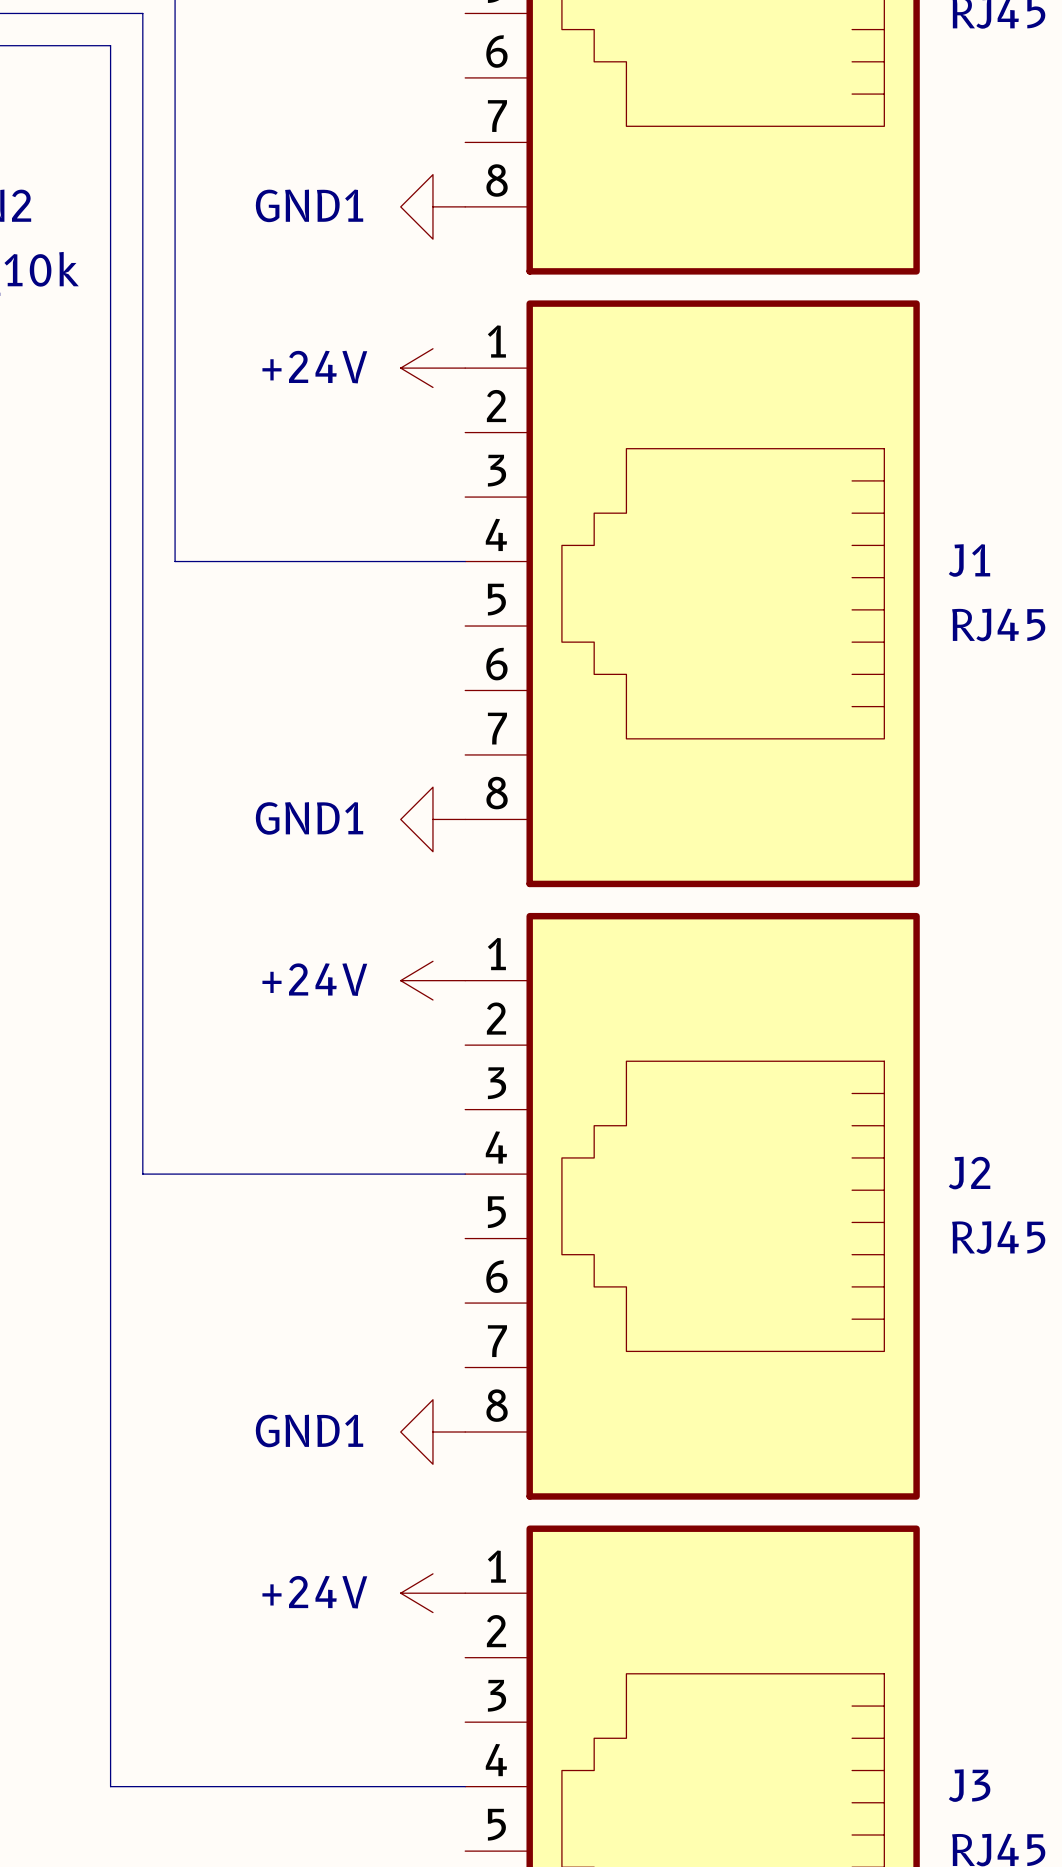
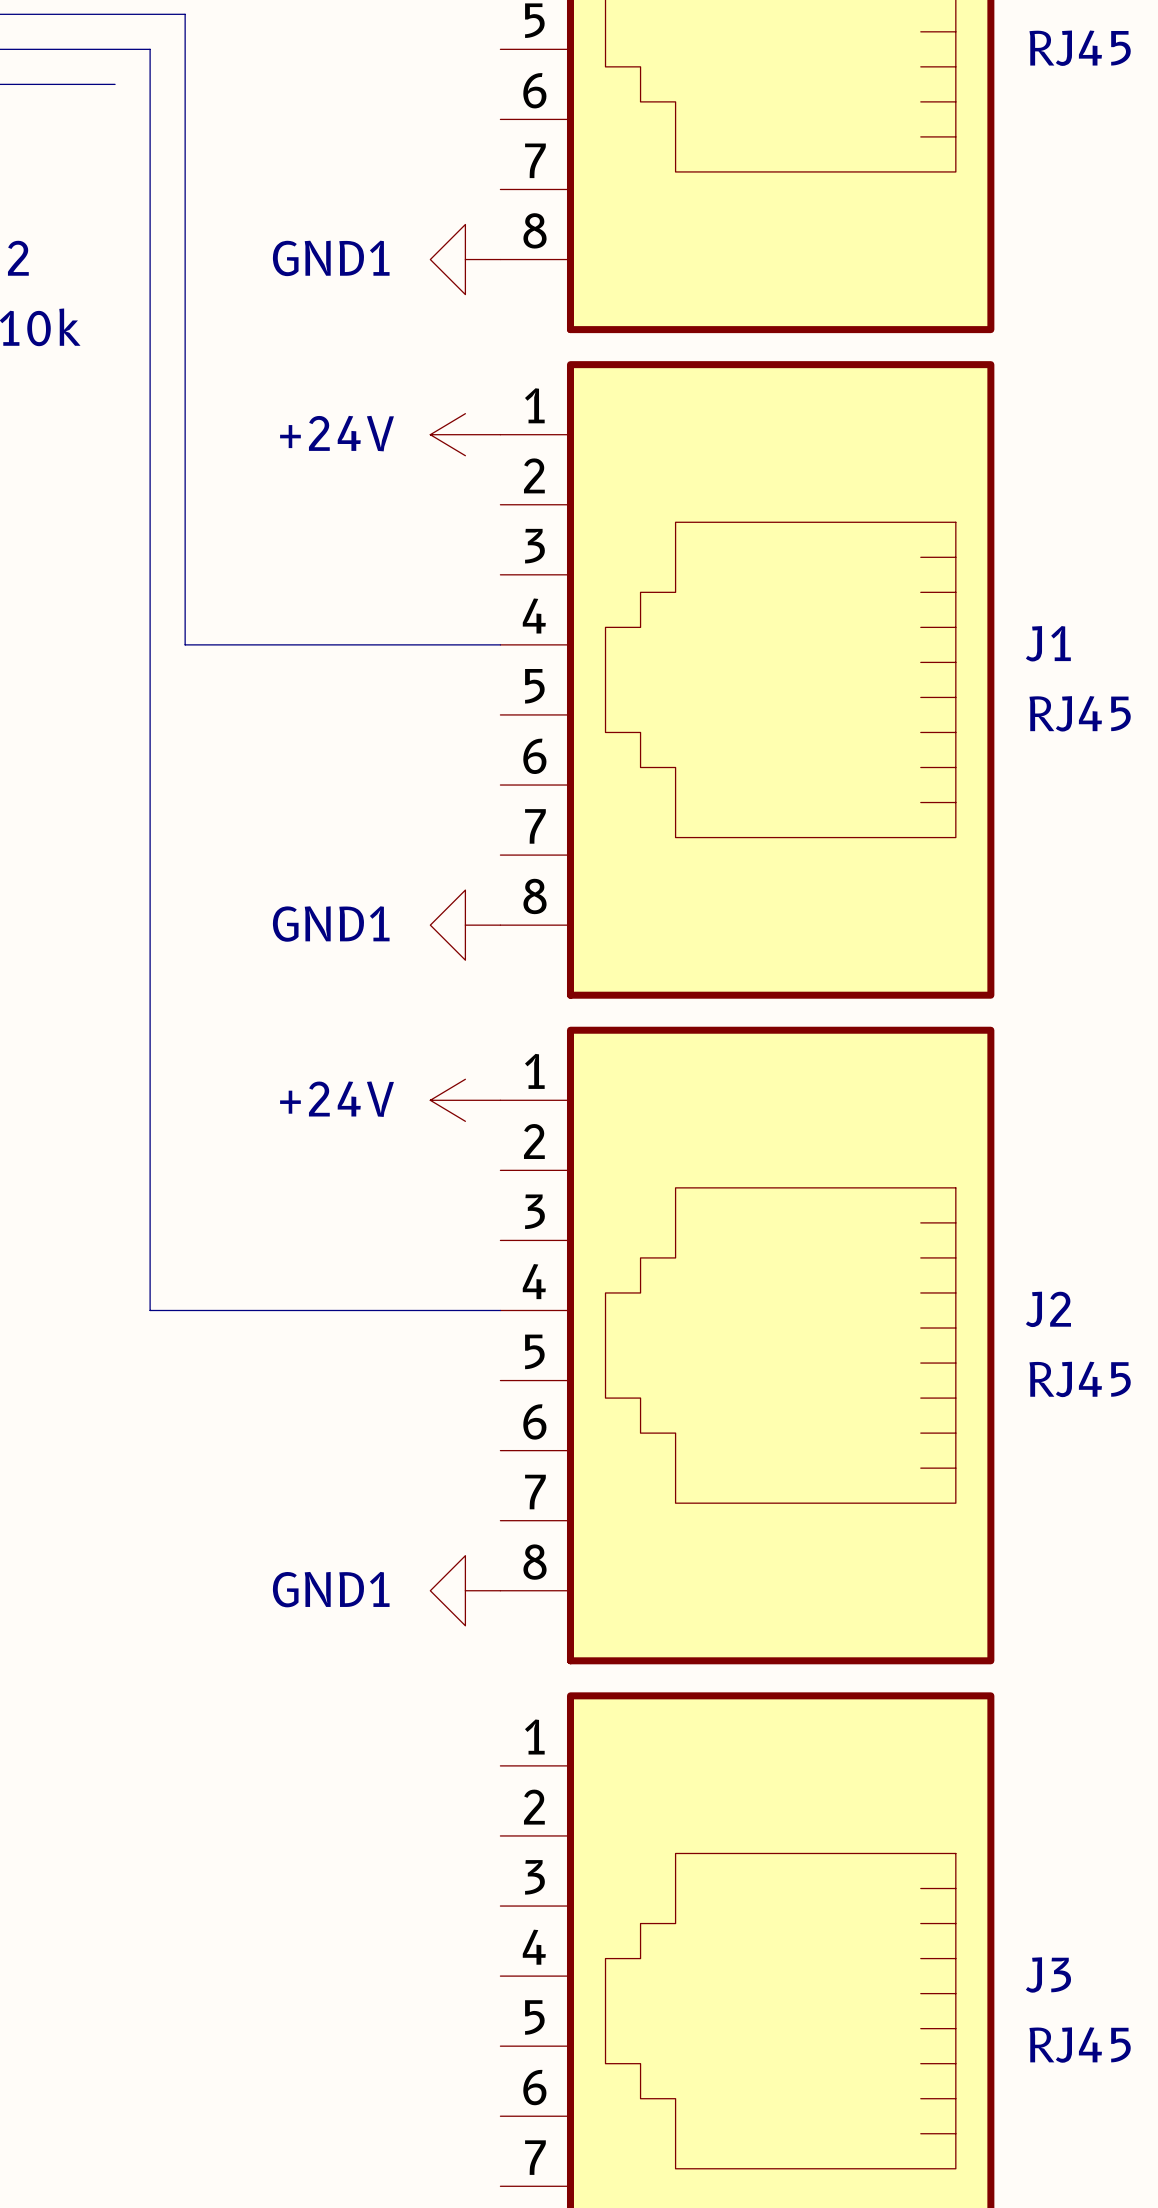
wire: (110, 45) (110, 1786) (465, 1786) -> none
power symbol: +24V (432, 1593) -> none

